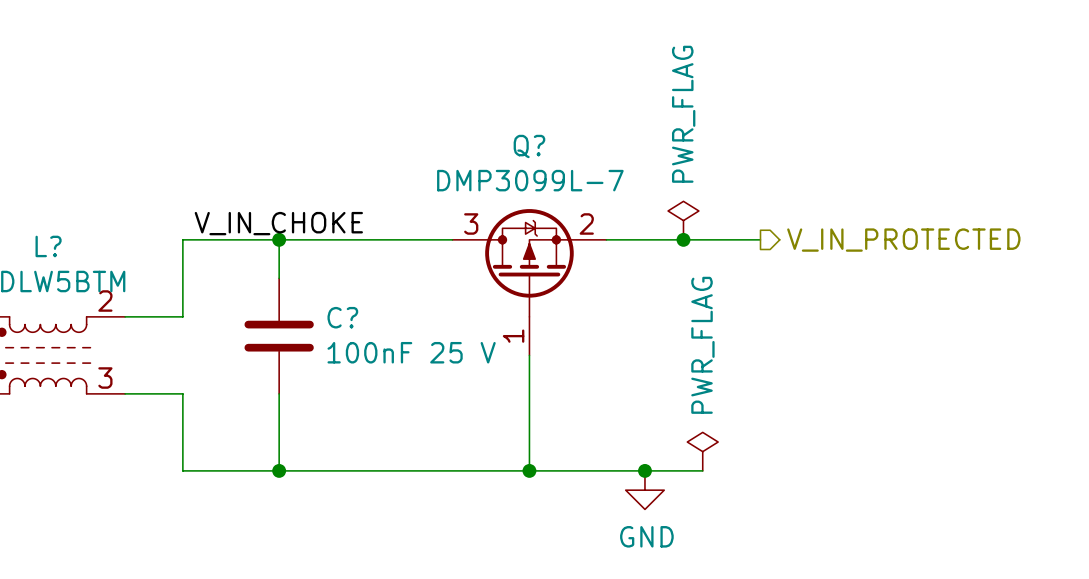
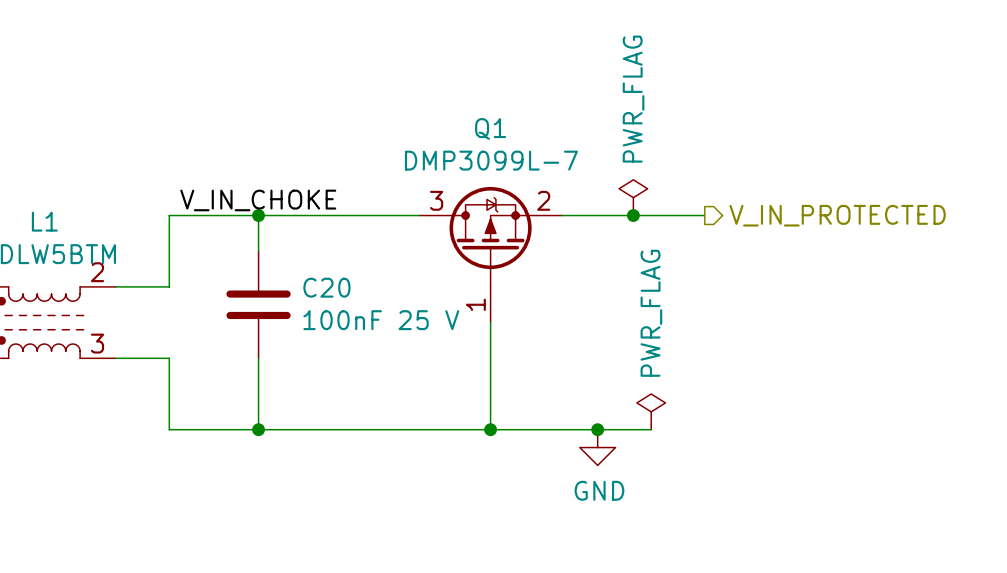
Q? name: Q? (529, 146) -> Q1 (490, 128)
L? name: L? (48, 246) -> L1 (44, 221)
C? name: C? (342, 317) -> C20 (326, 287)

